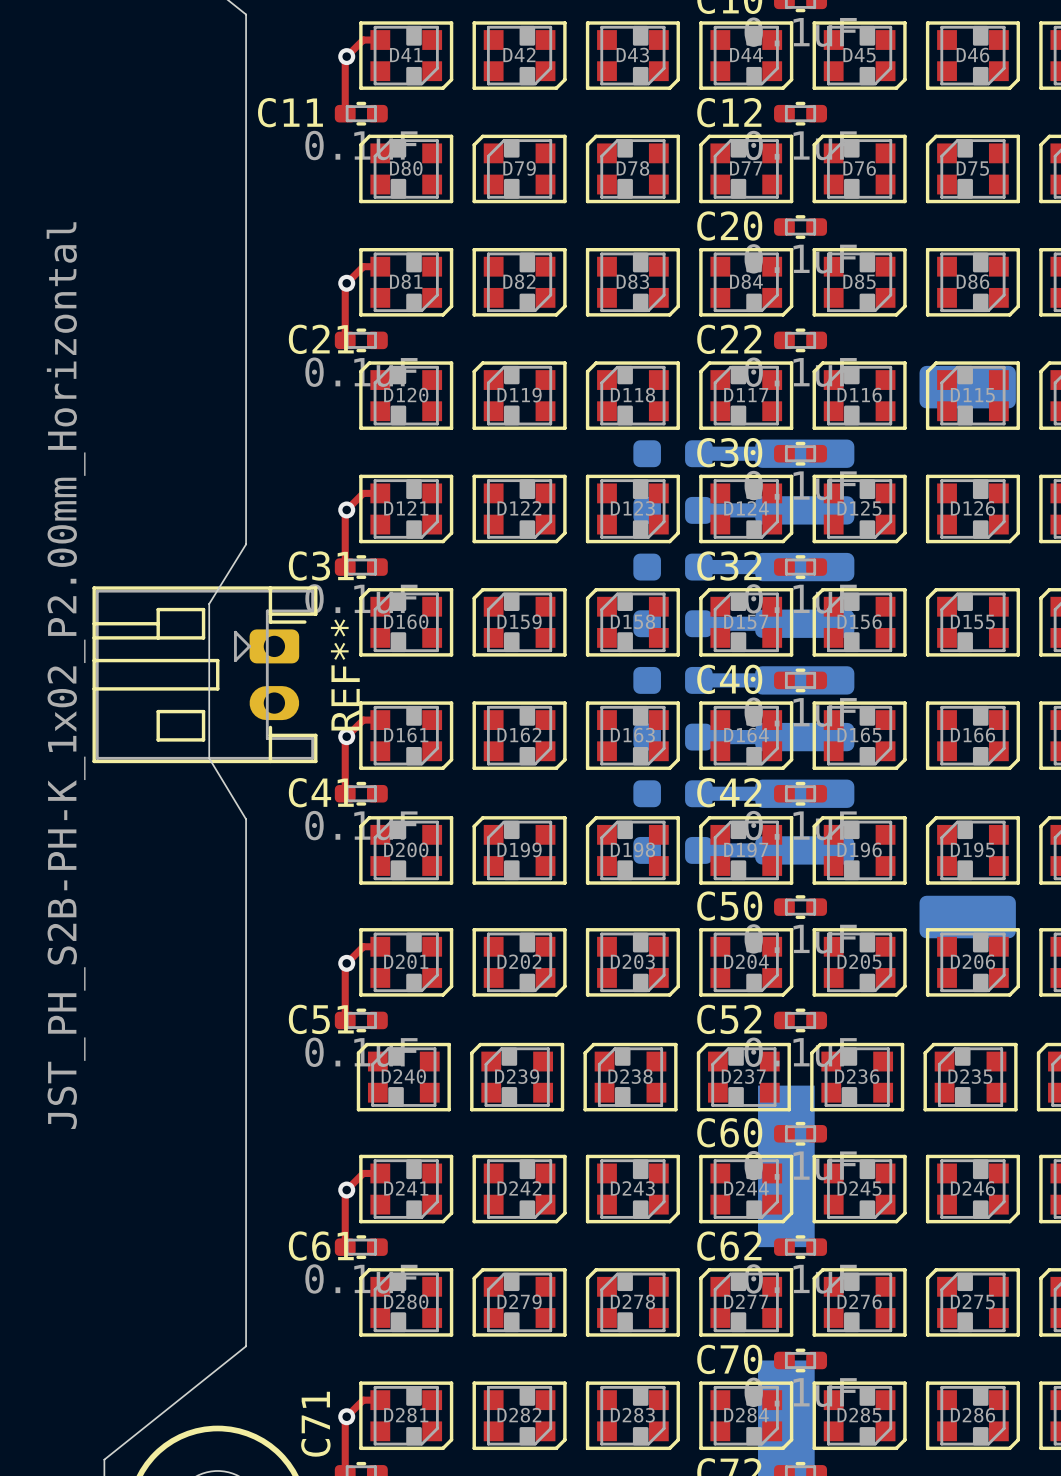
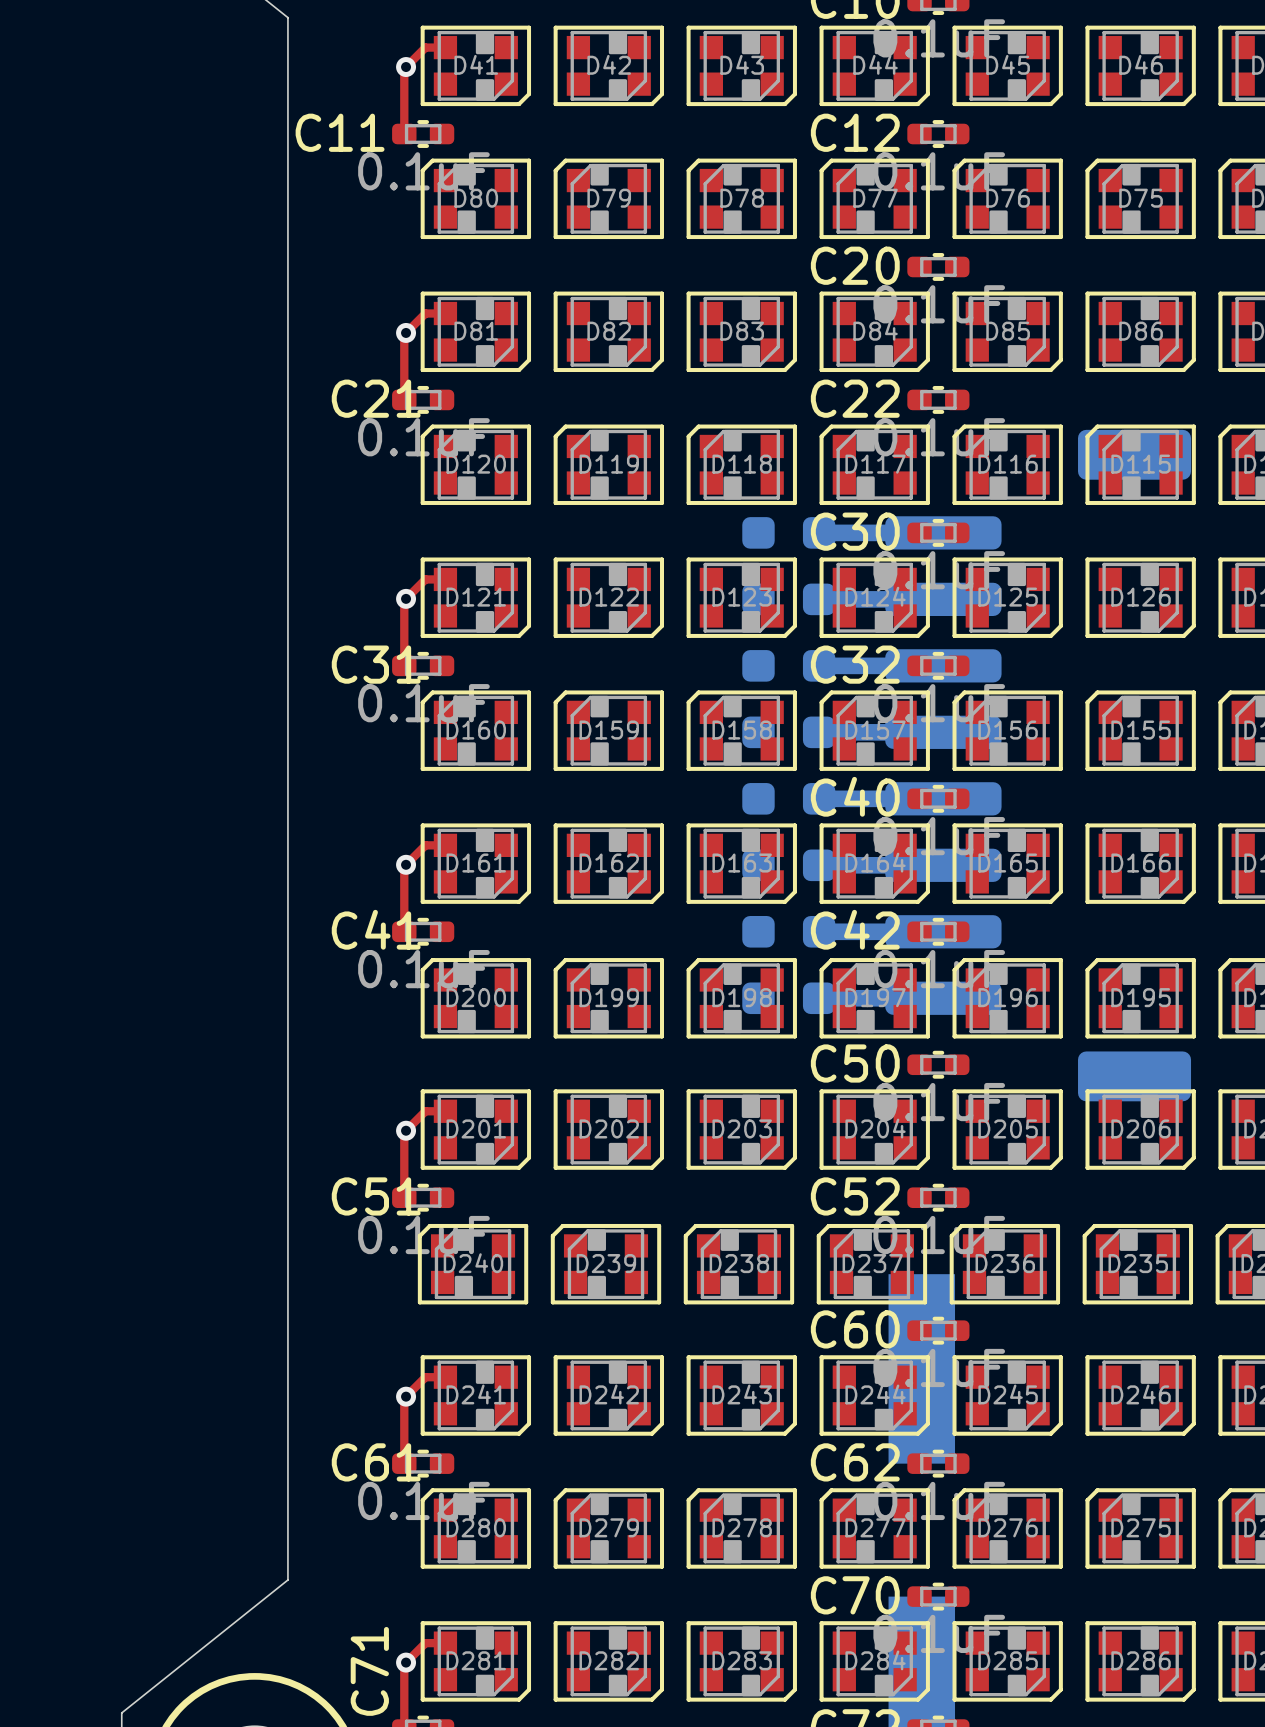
board edge: (246, 544) (209, 603) (209, 758) (246, 819) -> (287, 639) (287, 961)
REF**: JST_PH_S2B-PH-K_1x02_P2.00mm_Horizontal (204, 674) -> none

